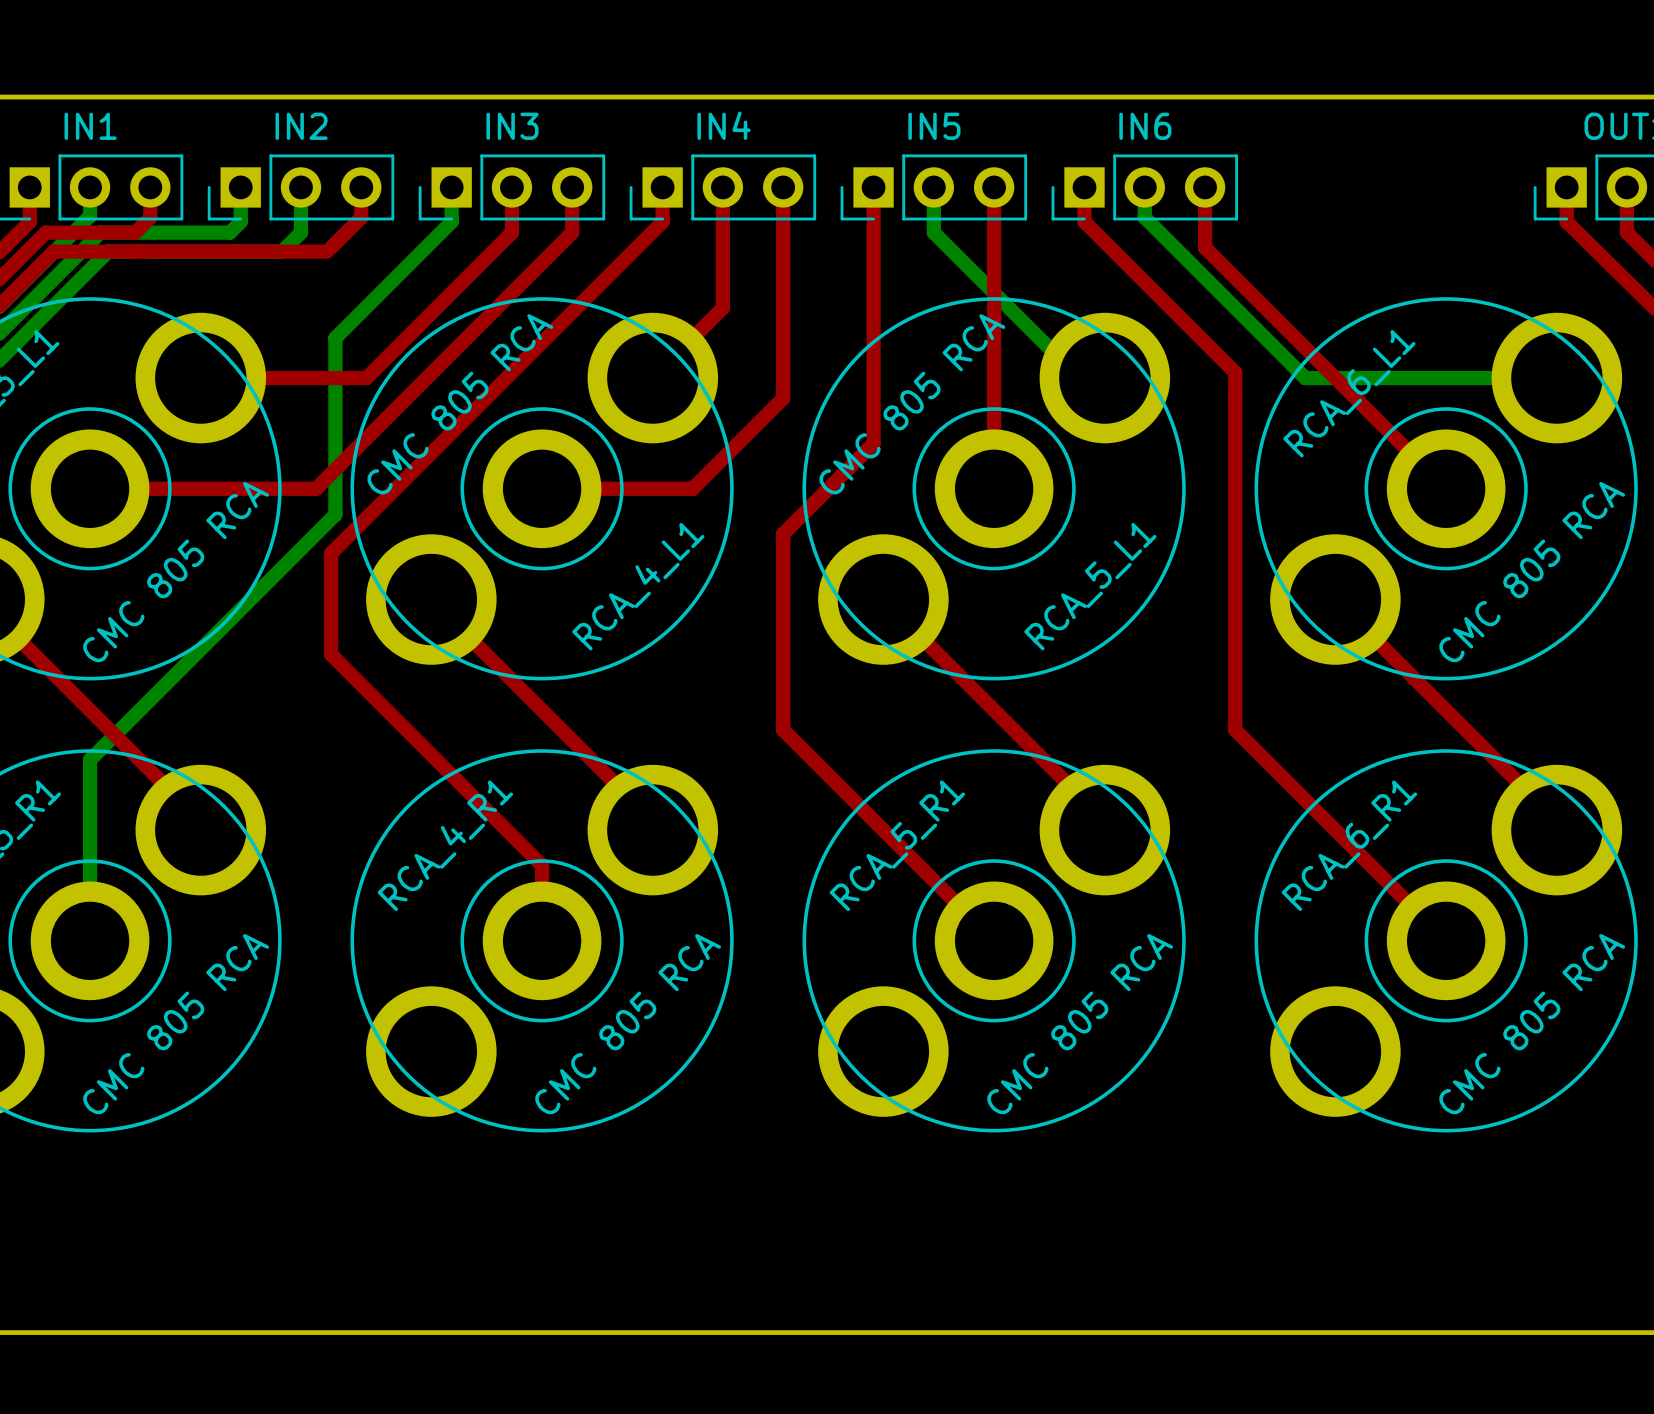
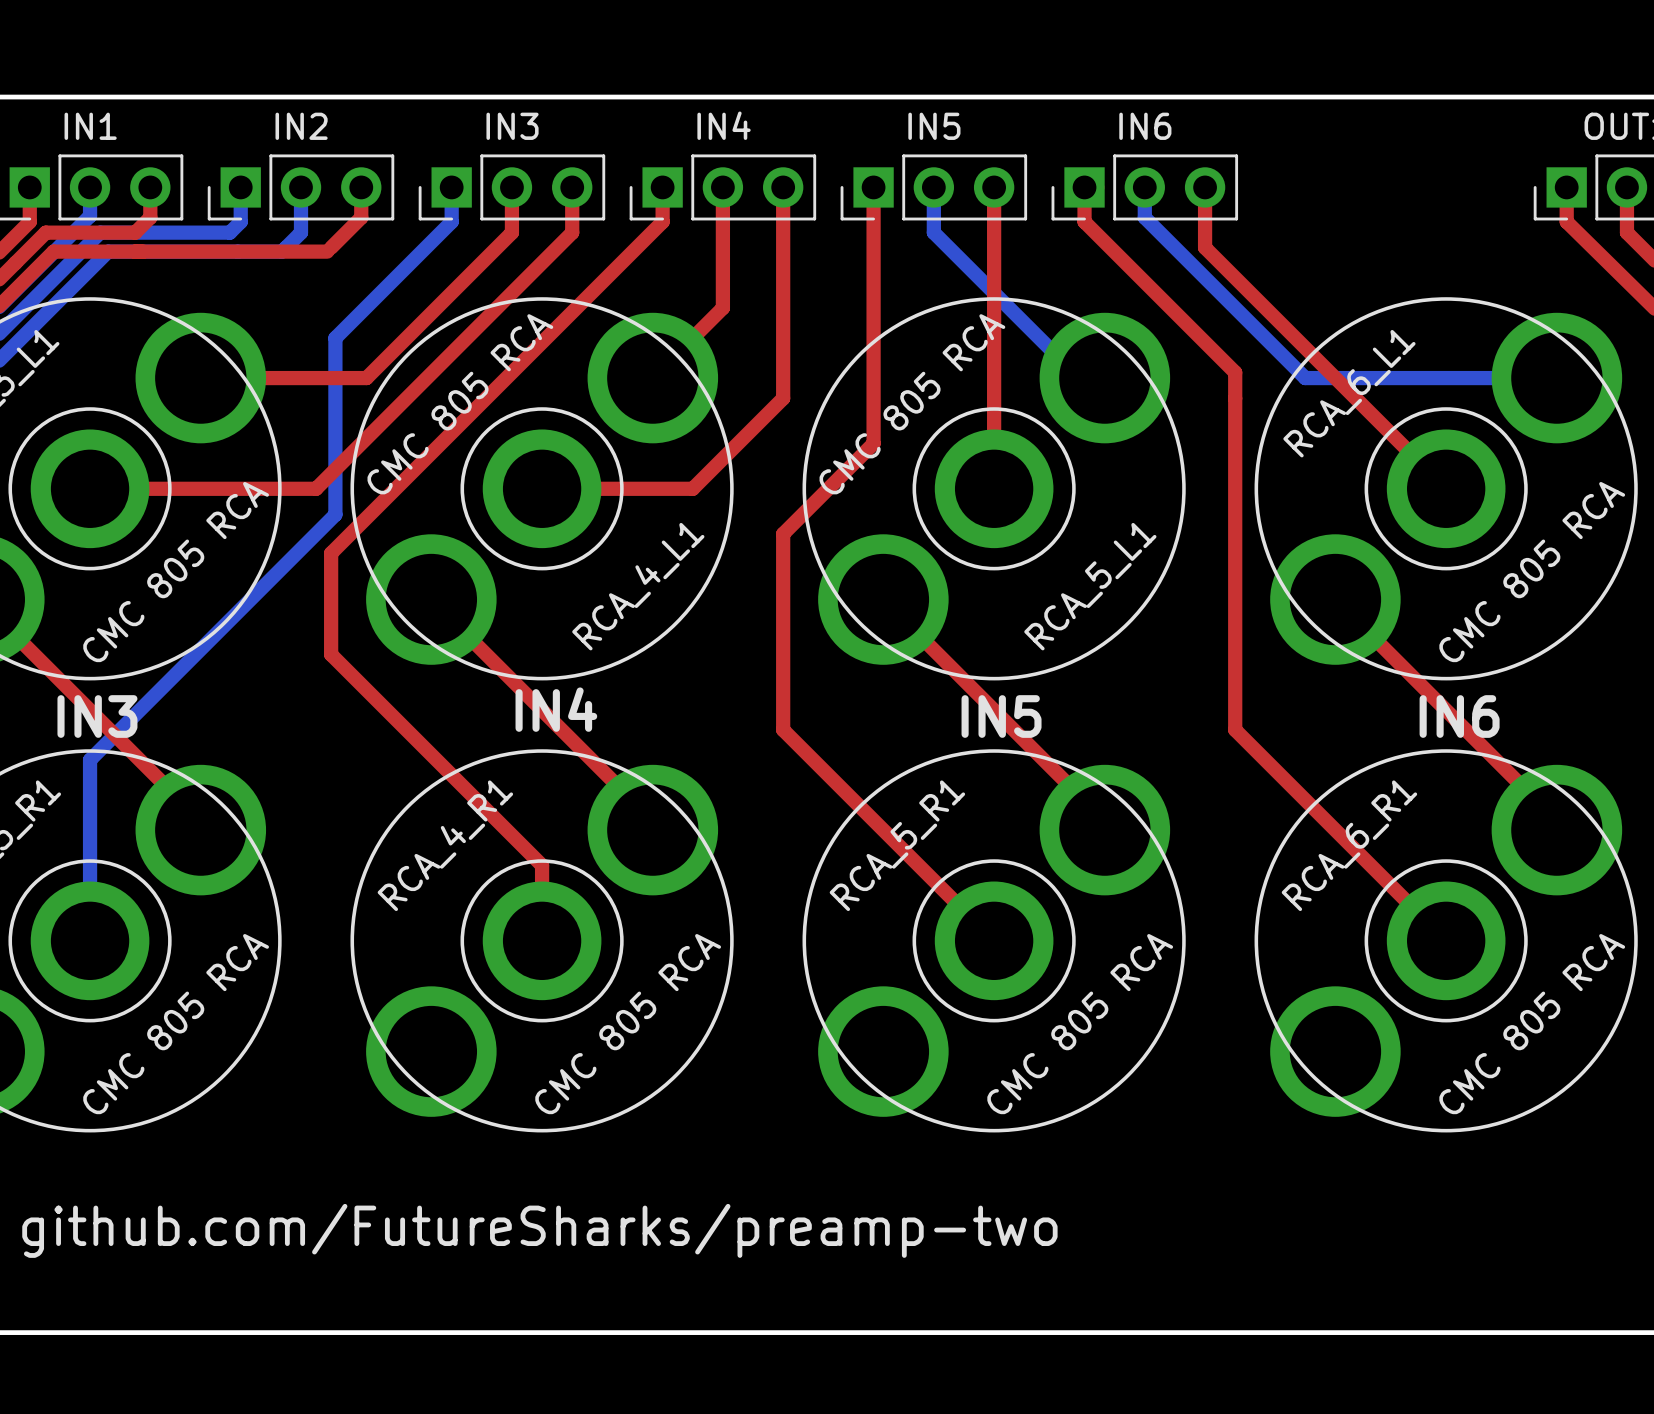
text: none -> IN4 (556, 709)
text: none -> IN3 (97, 716)
text: none -> IN5 (1001, 716)
text: none -> IN6 (1459, 716)
text: none -> github.com/FutureSharks/preamp-two (539, 1230)

